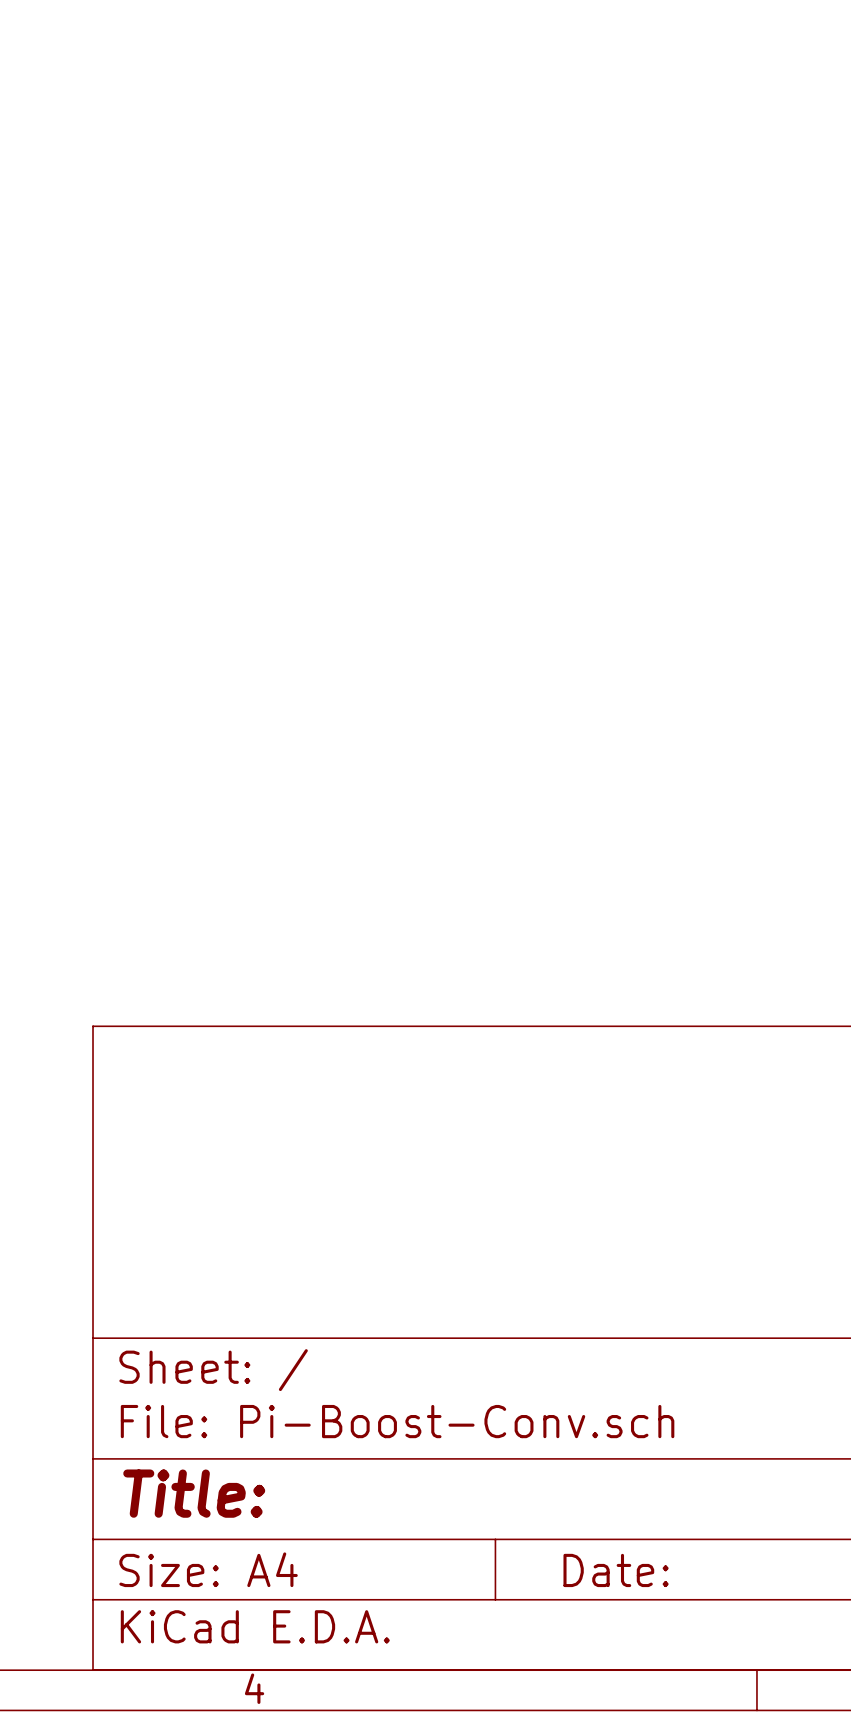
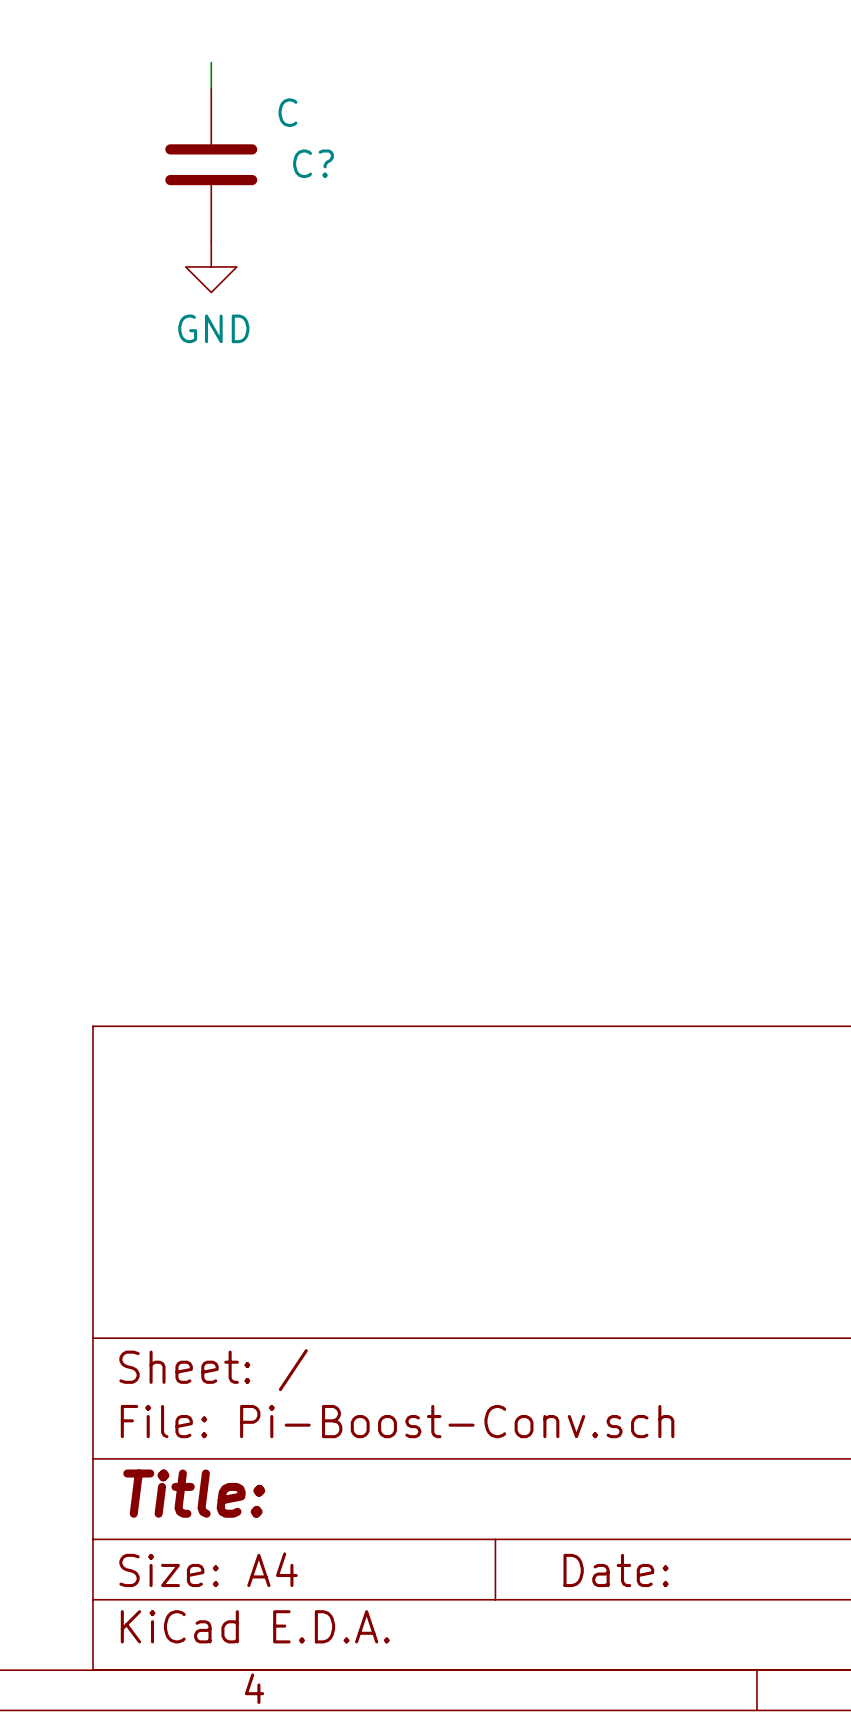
wire: none -> (211, 62) (211, 88)
C?: none -> C (211, 164)
power symbol: none -> GND (211, 266)

